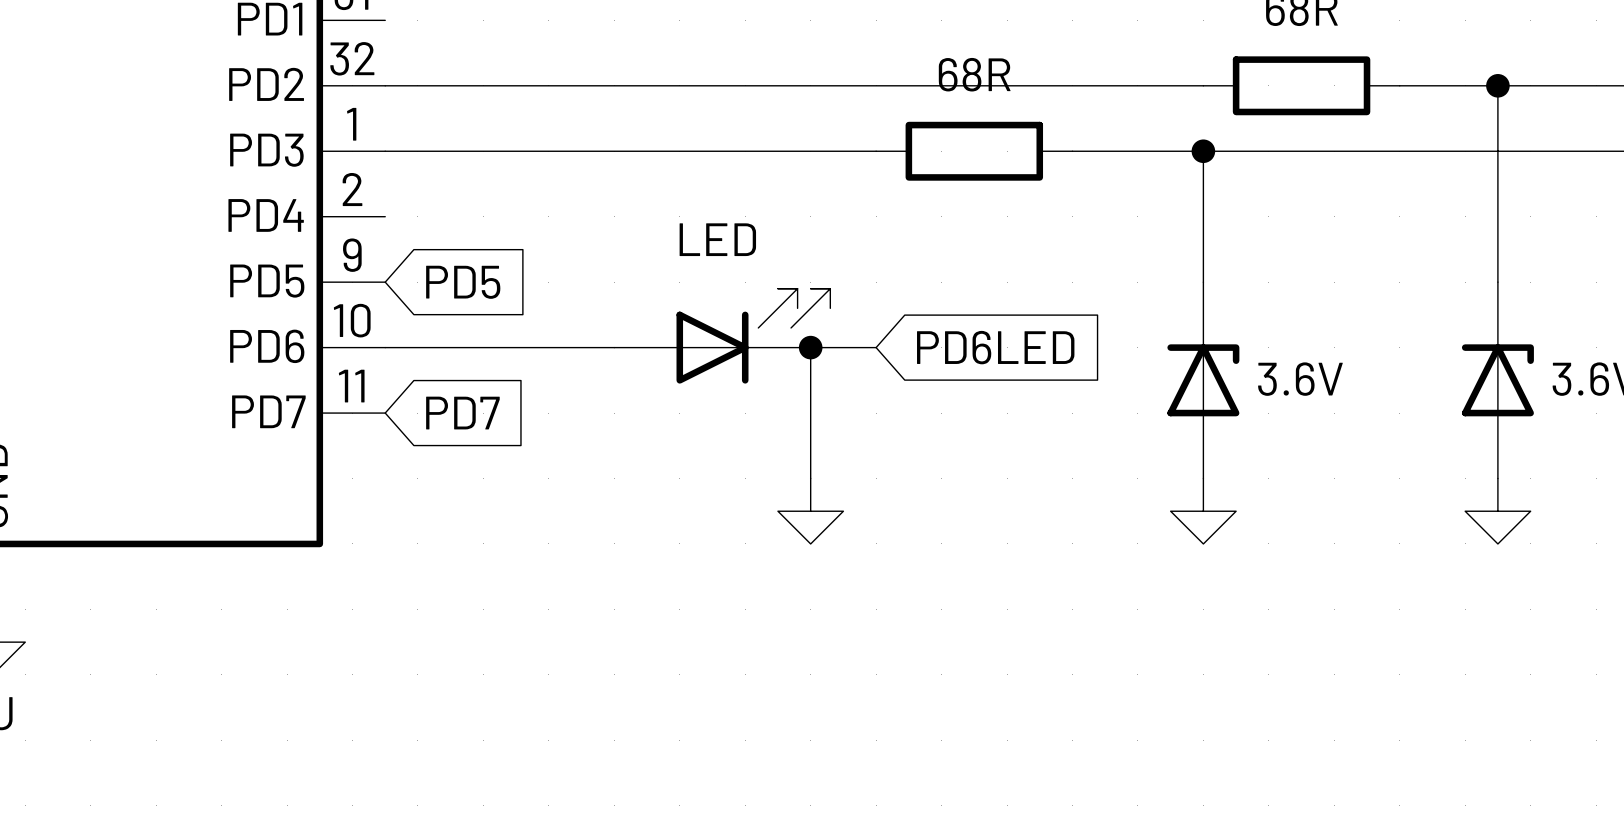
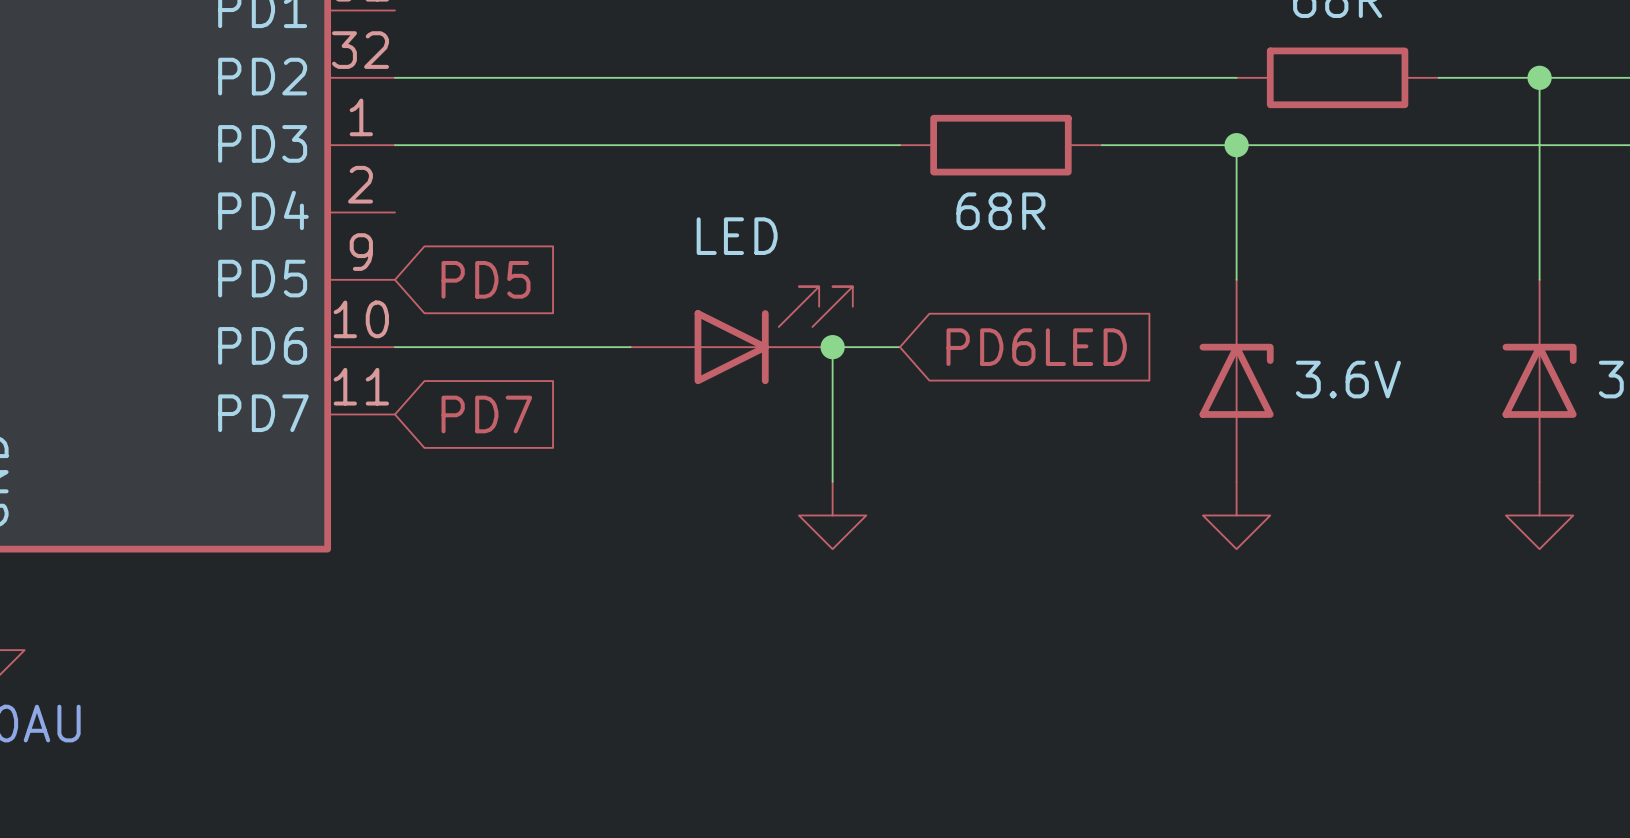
part value position: 68R (974, 74) -> 68R (1000, 211)

